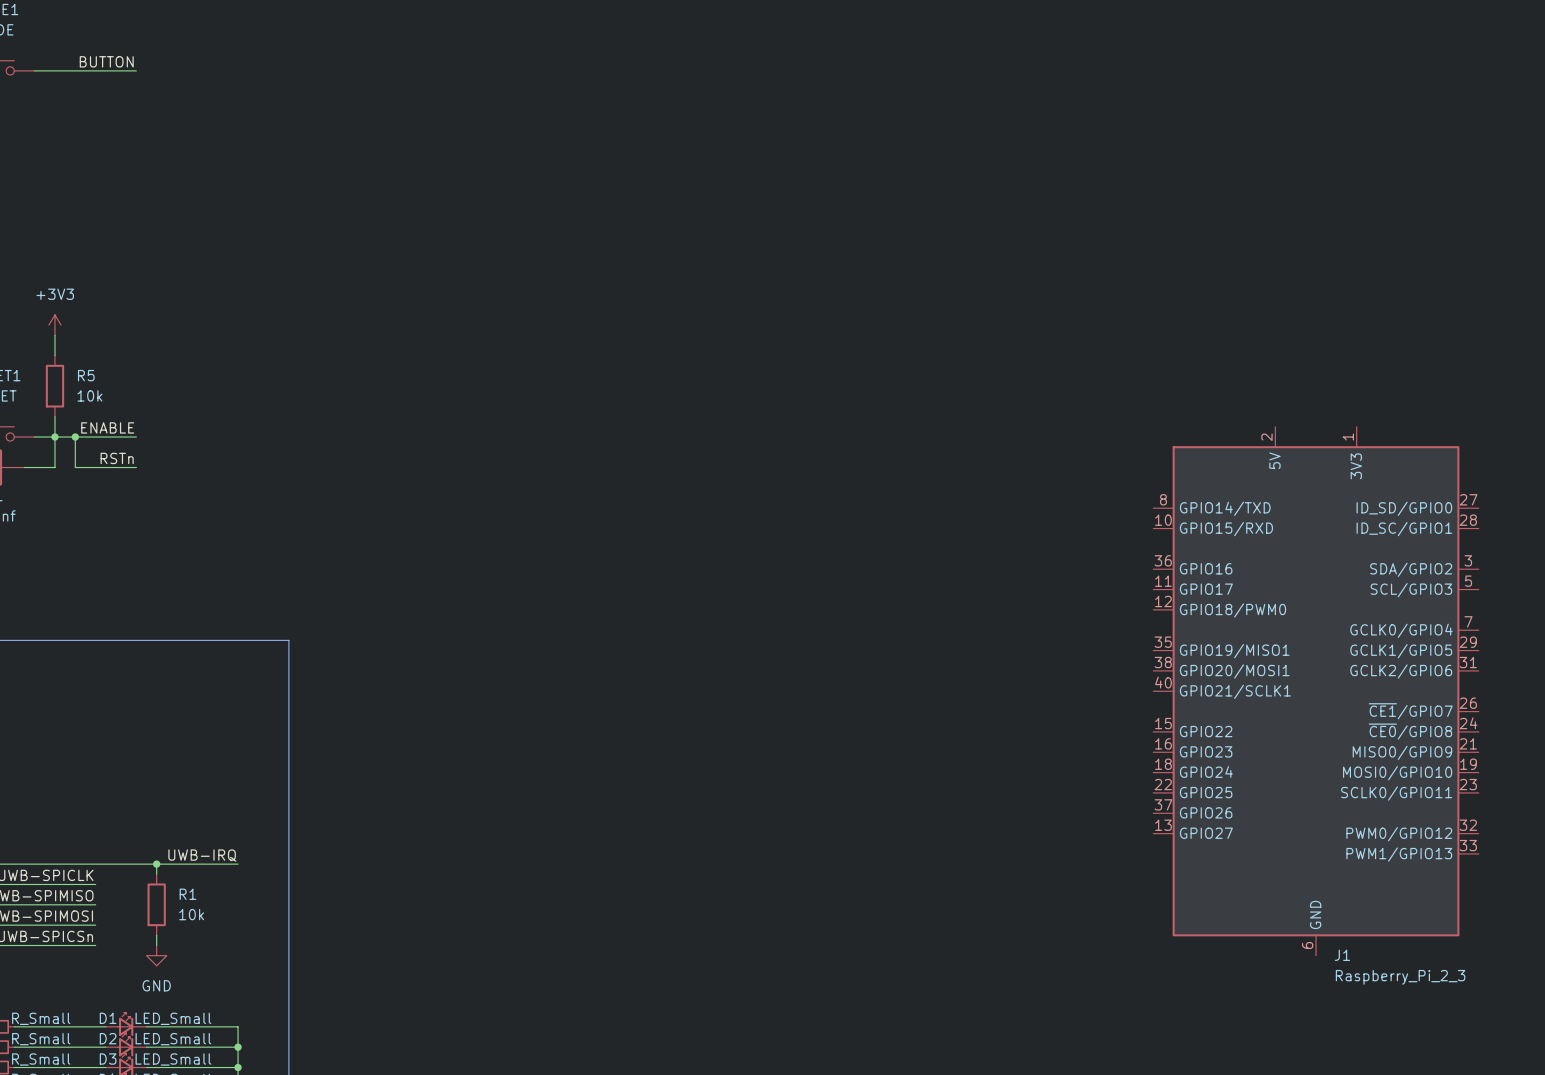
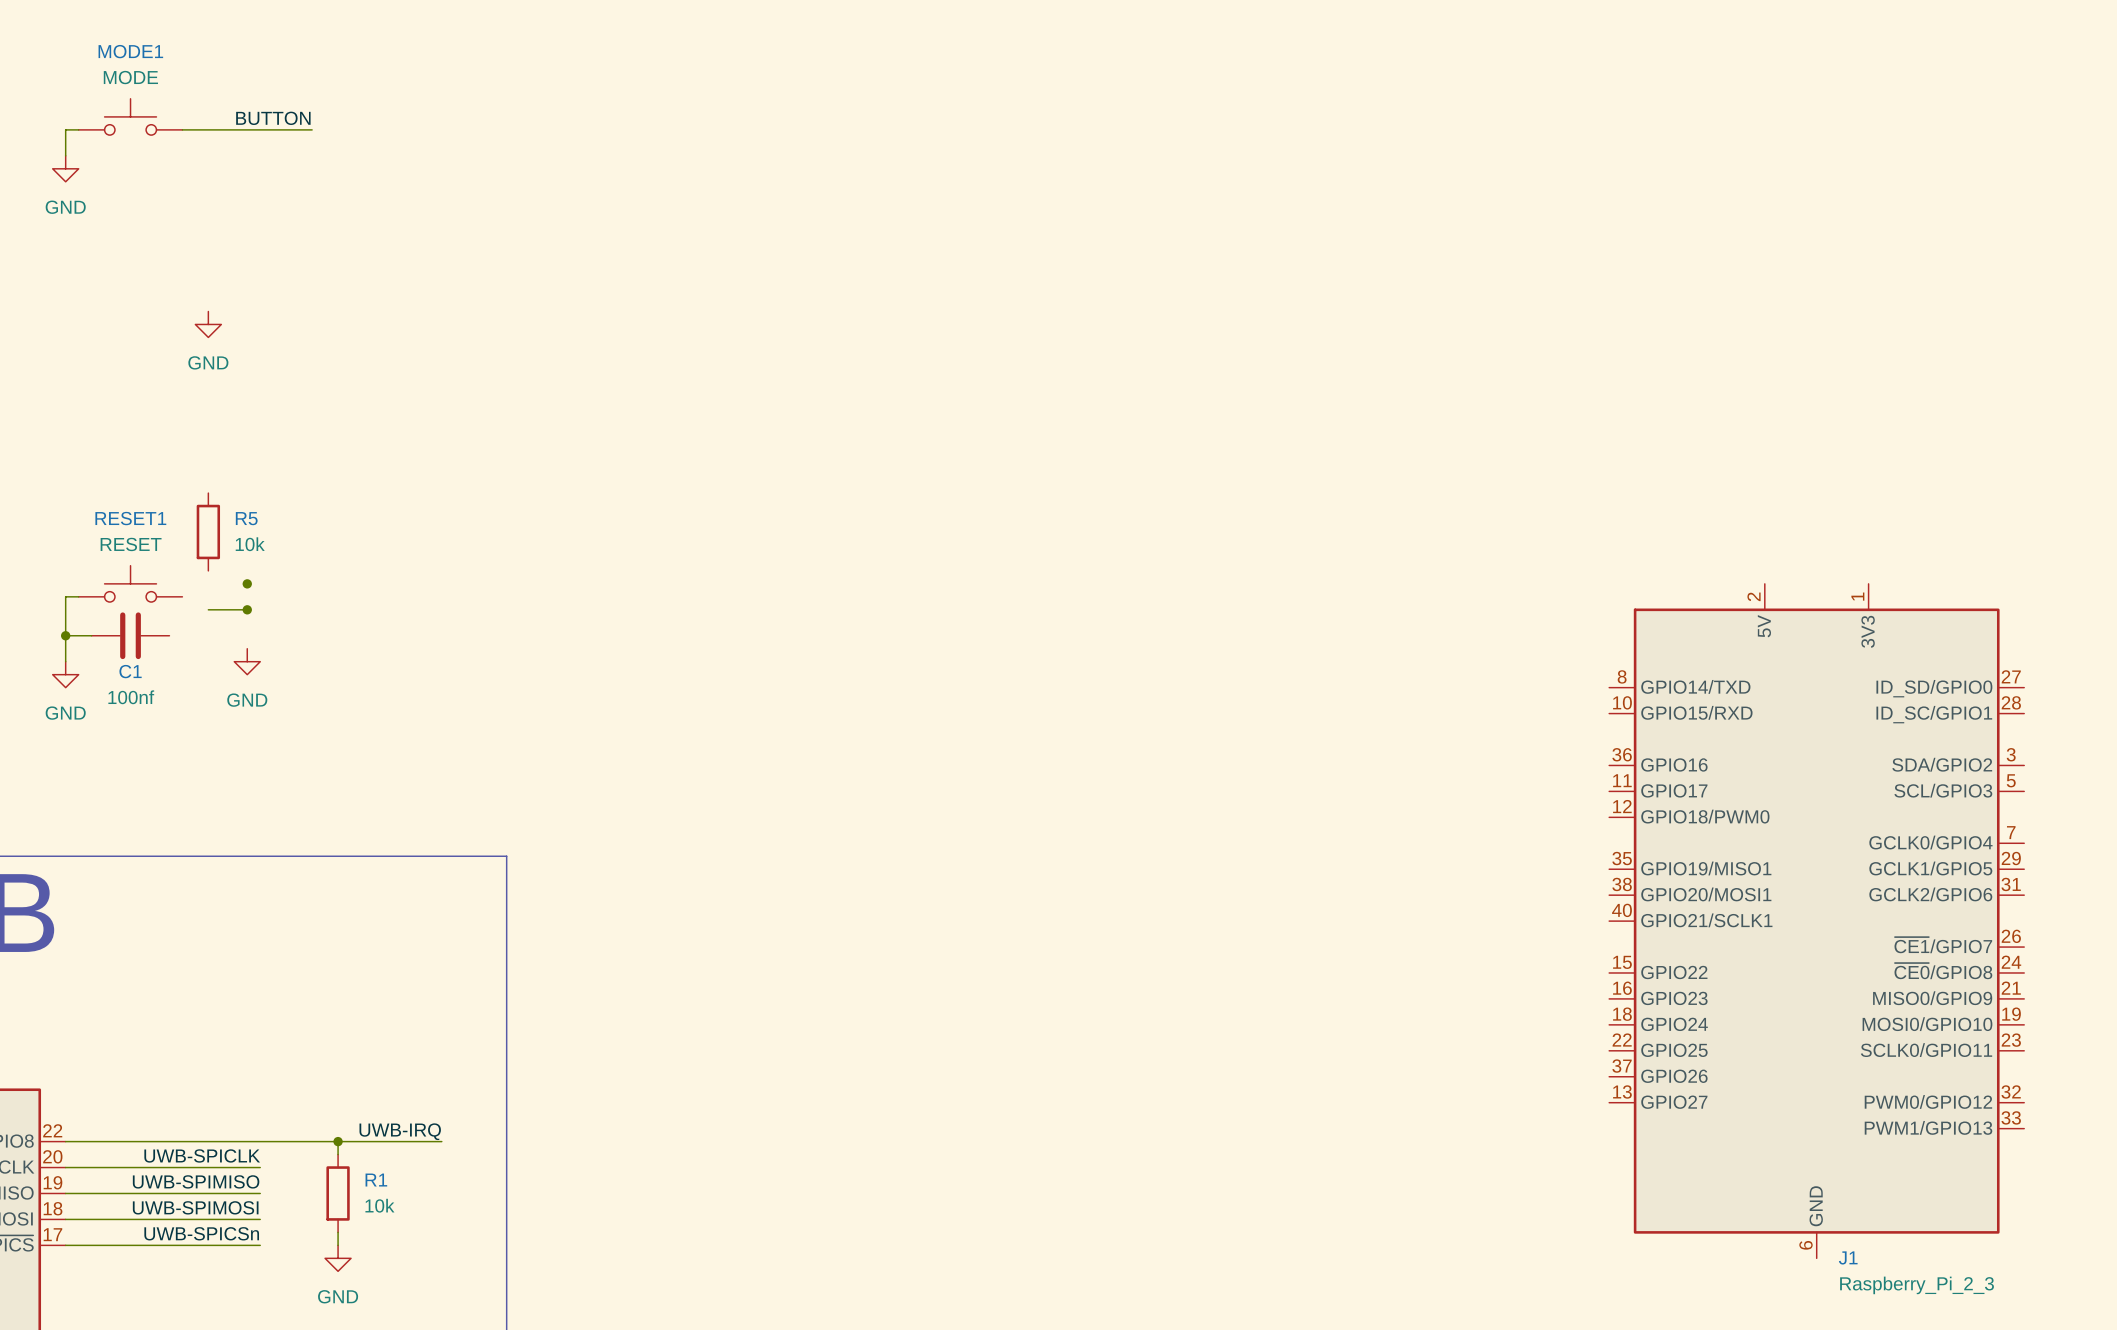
power symbol: none -> GND (208, 324)
power symbol: +3V3 (54, 325) -> none
wire: (54, 335) (54, 355) -> none
wire: (54, 416) (54, 467) (24, 467) -> none
junction: none -> (247, 583)
label: ENABLE (107, 427) -> none
wire: (34, 437) (136, 437) -> none
junction: (54, 437) -> none
wire: (75, 437) (75, 467) (136, 467) -> none
junction: (75, 437) -> none
wire: none -> (208, 609) (247, 609)
junction: none -> (247, 609)
label: RSTn (117, 458) -> none
power symbol: none -> GND (247, 661)

